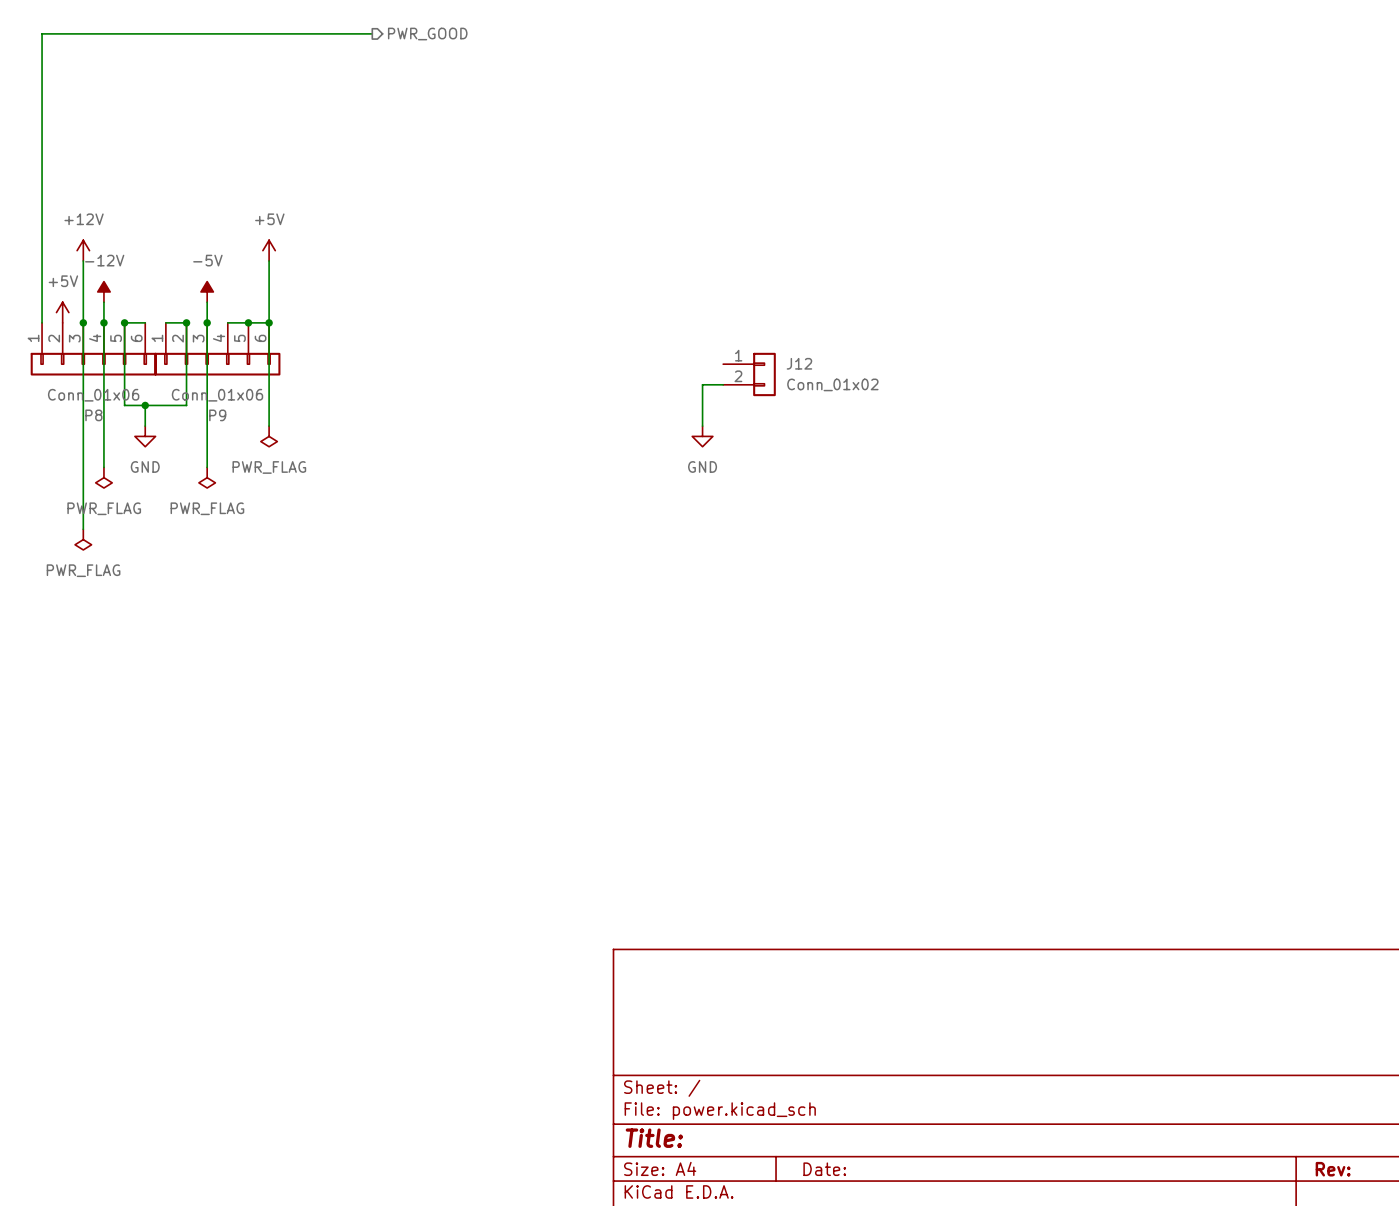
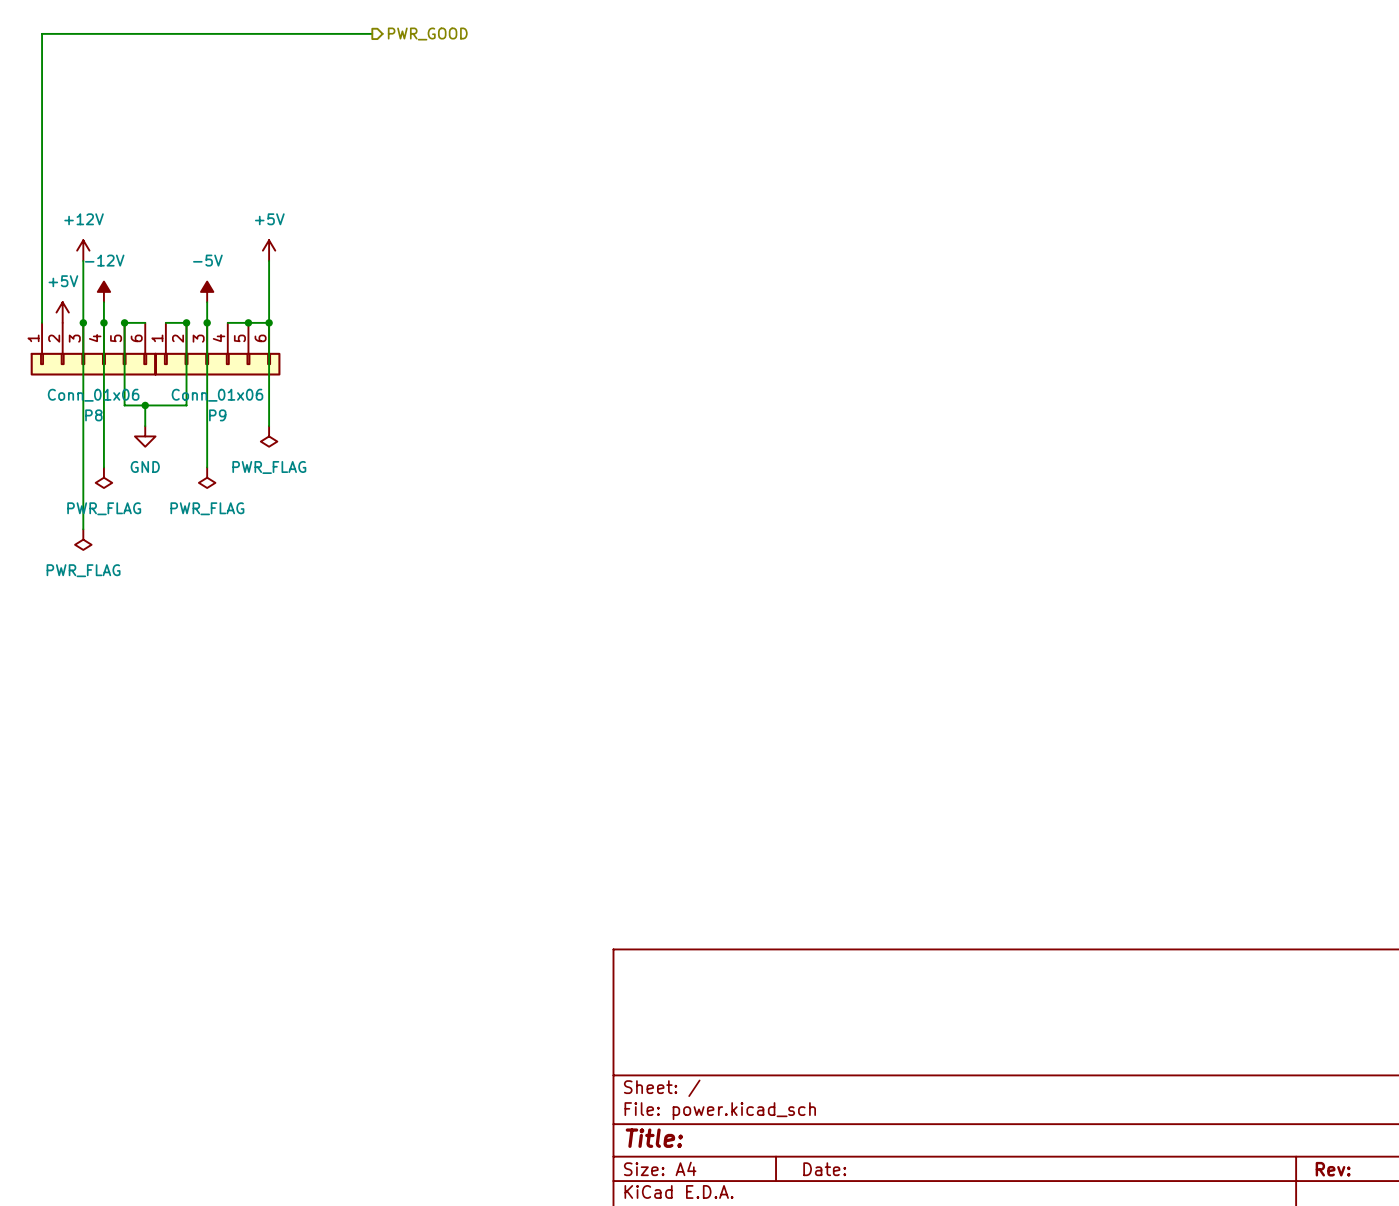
J12: Conn_01x02 (749, 374) -> none
wire: (723, 384) (702, 384) (702, 426) -> none
power symbol: GND (702, 436) -> none

